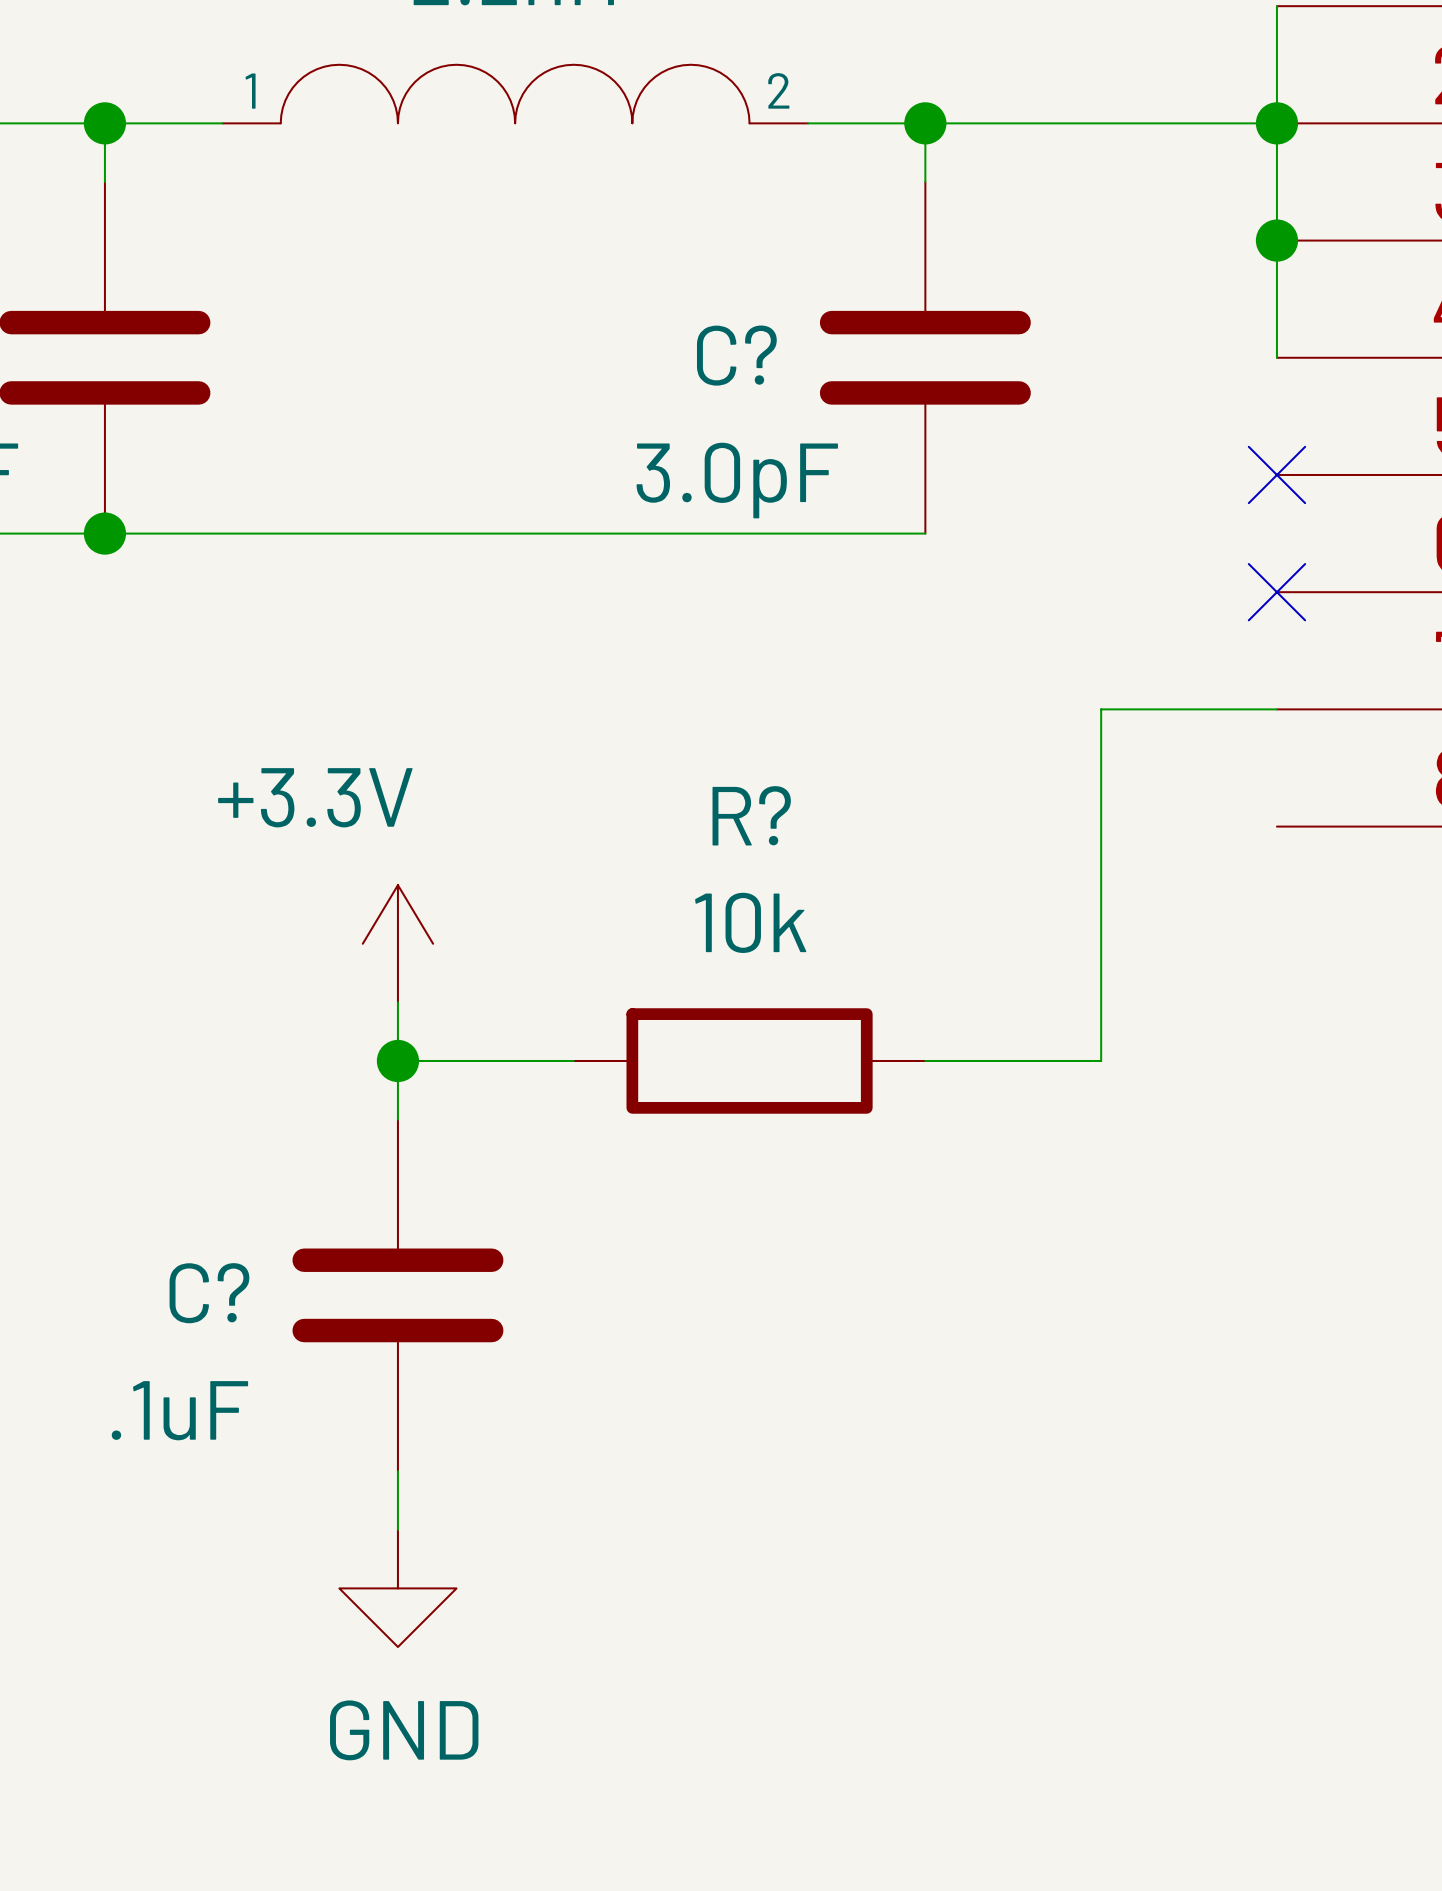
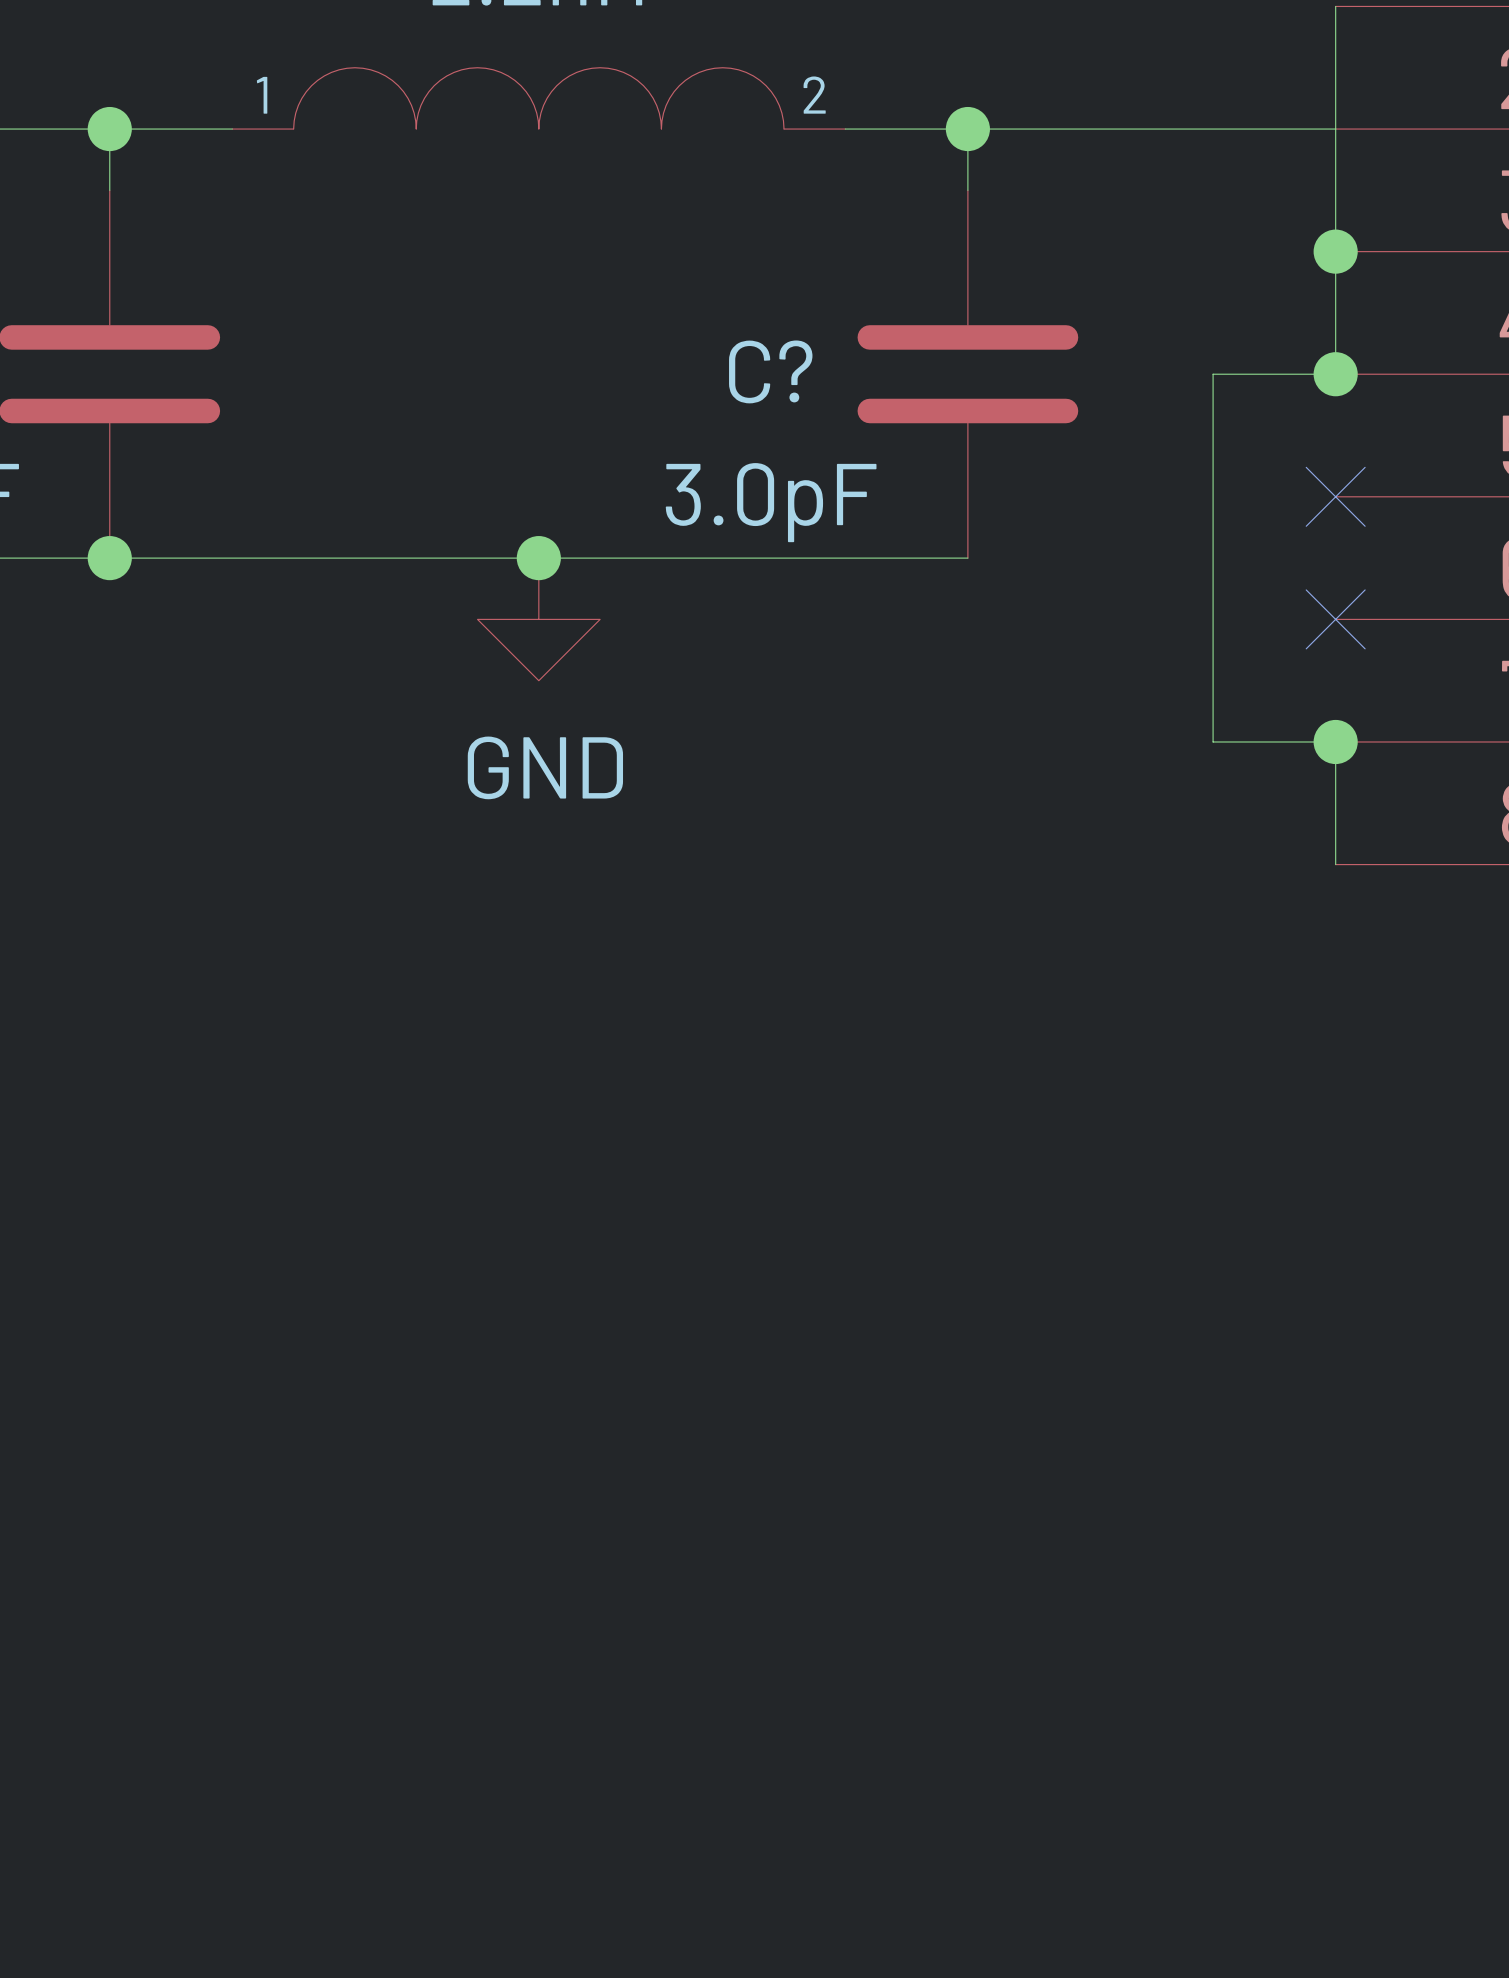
junction position: (1276, 123) -> (1335, 374)
junction: none -> (538, 558)
wire: (1159, 709) (1101, 709) (1101, 1060) (925, 1060) -> (1213, 741) (1213, 374) (1335, 374)
junction: none -> (1335, 741)
power symbol: +3.3V (397, 943) -> none
wire: (397, 1002) (397, 1119) -> (1335, 741) (1335, 864)
wire: (397, 1060) (573, 1060) -> none
junction: (397, 1060) -> none
R?: 10k (749, 1060) -> none
C?: .1uF (397, 1295) -> none
wire: (397, 1471) (397, 1529) -> none
power symbol position: GND (397, 1588) -> GND (538, 619)

